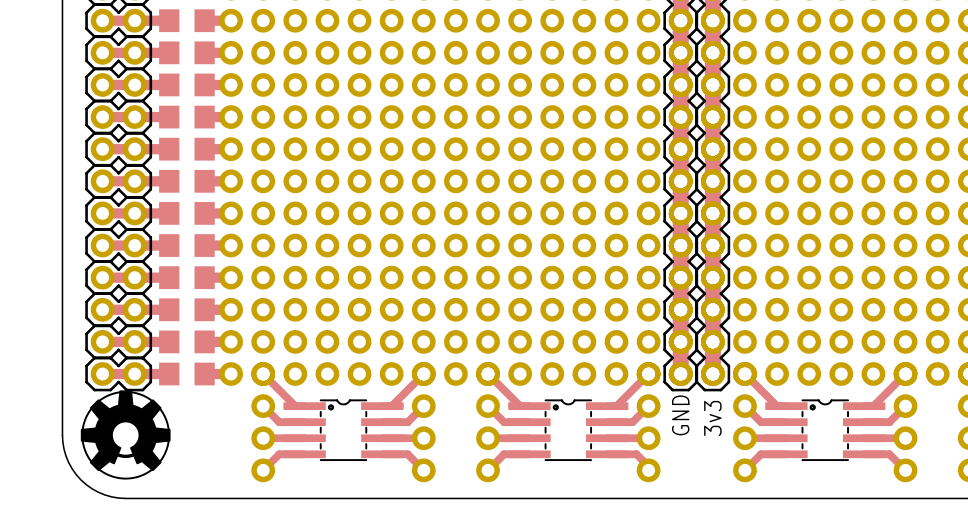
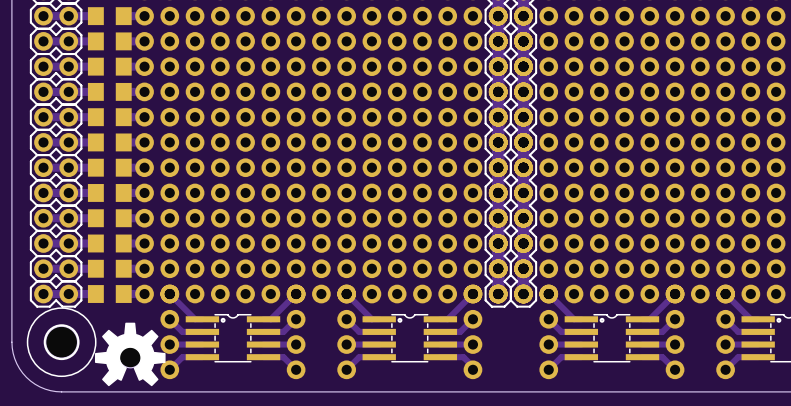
text: GND (680, 415) -> none
text: 3v3 (712, 418) -> none
drawing position: (125, 430) -> (130, 354)
part: none -> (130, 356)

